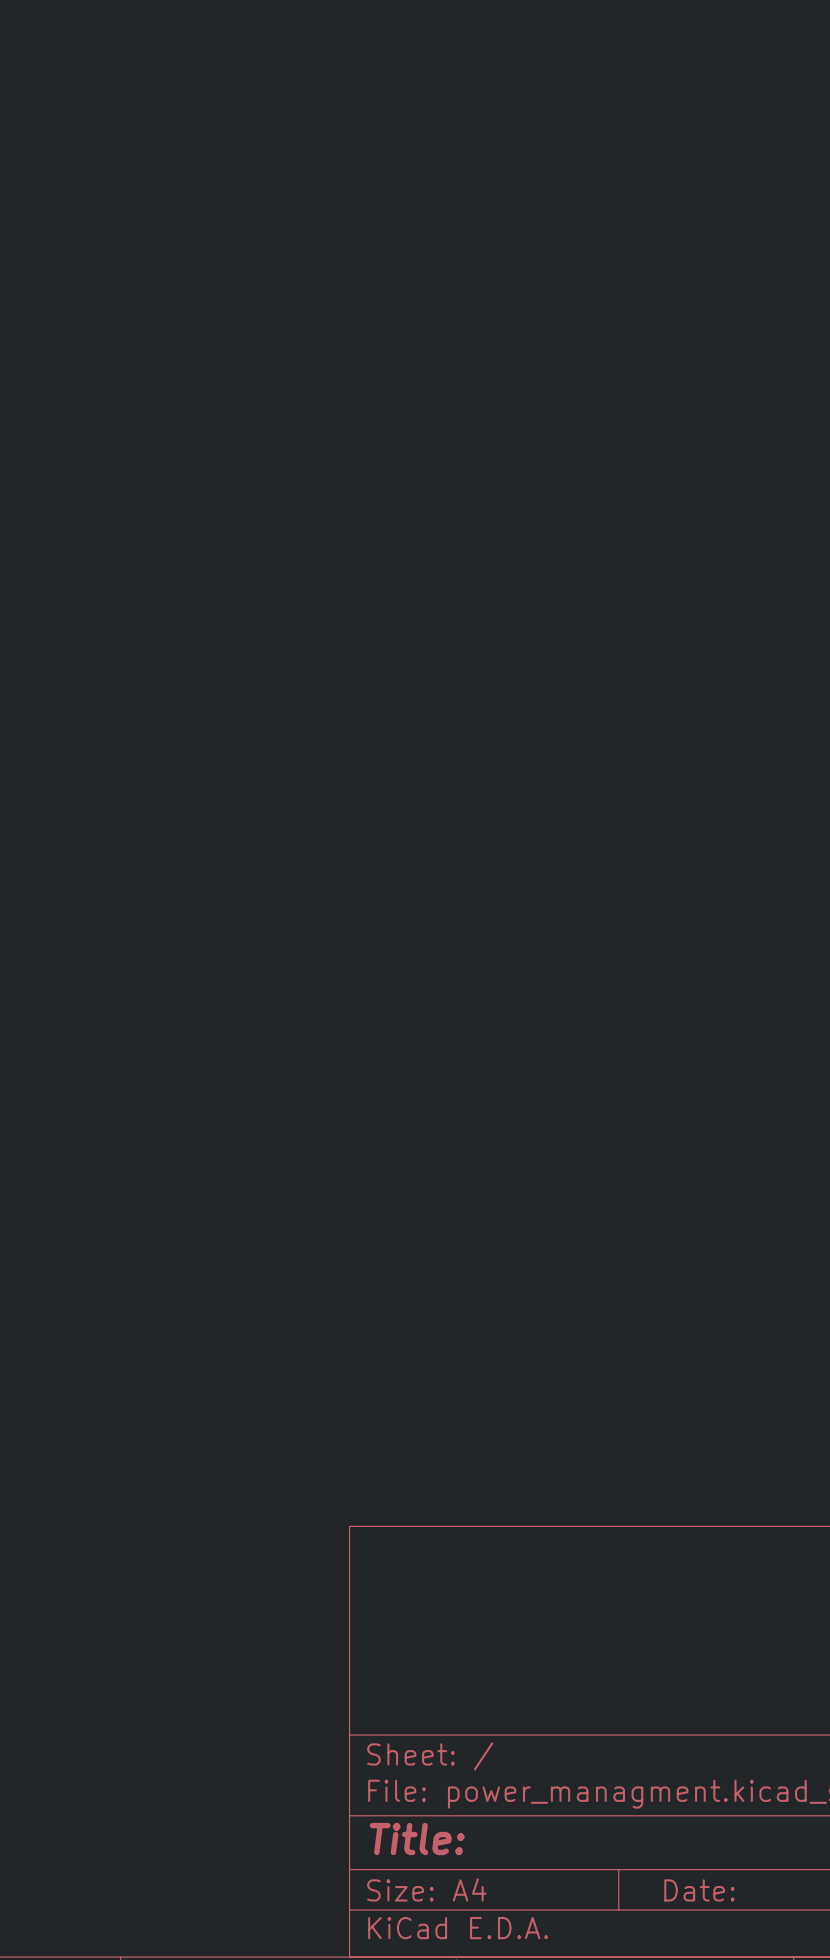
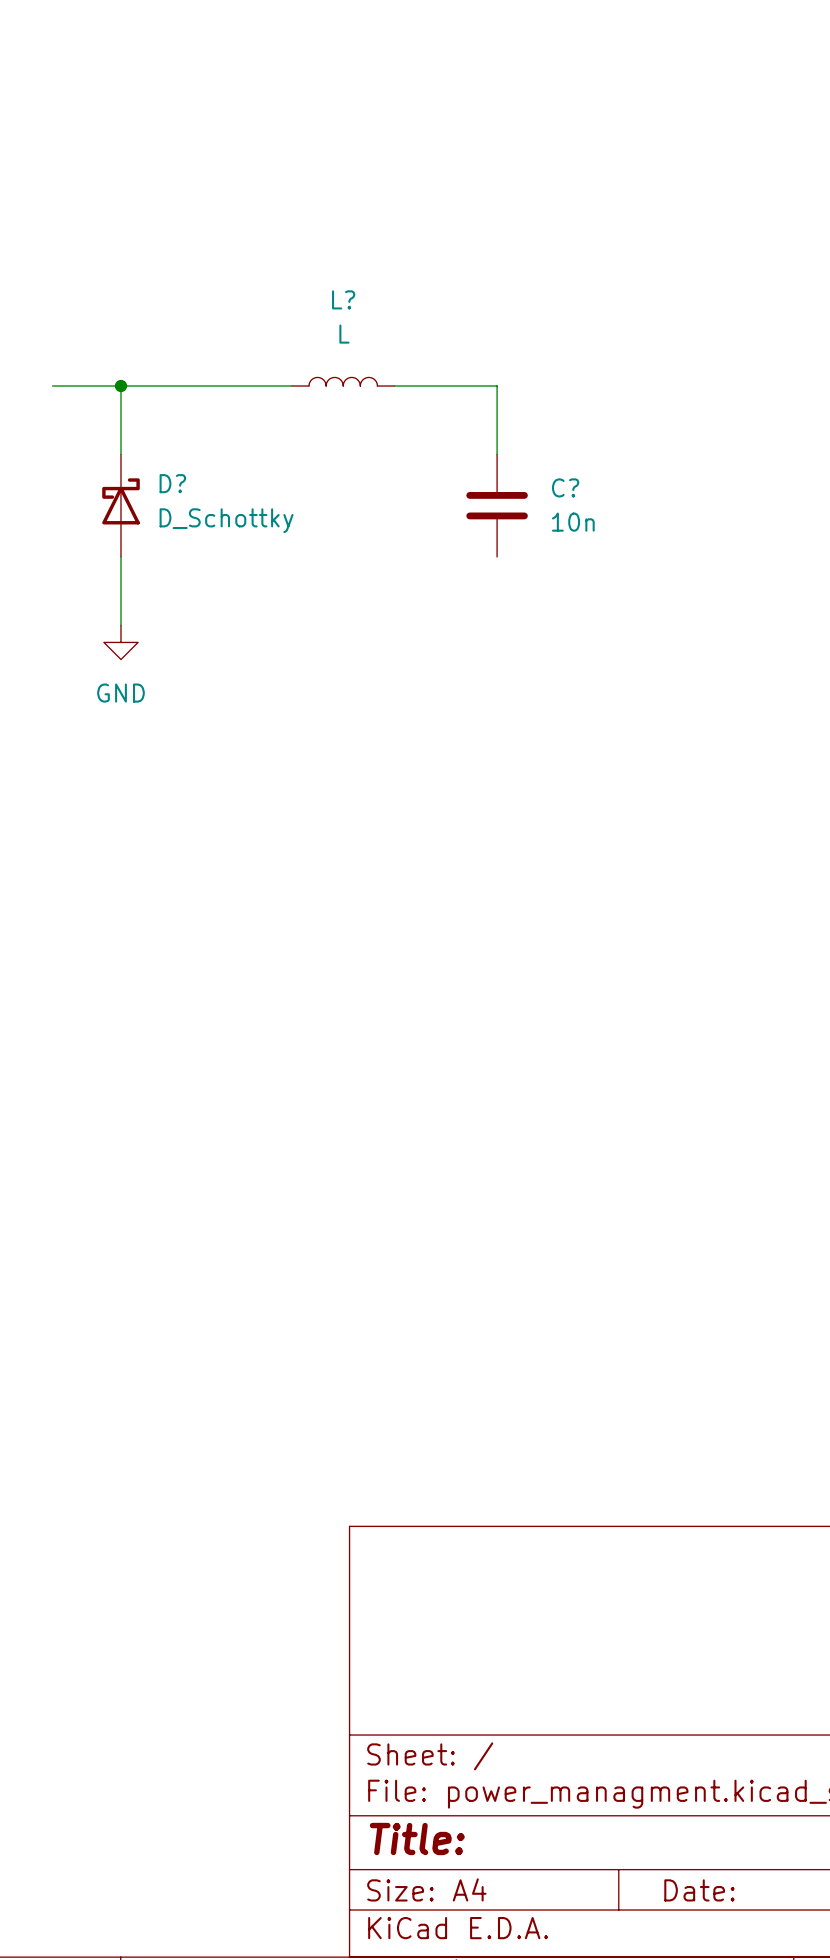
L?: none -> L (343, 381)
wire: none -> (52, 386) (291, 386)
wire: none -> (120, 386) (120, 454)
junction: none -> (120, 386)
wire: none -> (394, 386) (497, 386) (497, 454)
D?: none -> D_Schottky (120, 505)
C?: none -> 10n (497, 505)
wire: none -> (120, 556) (120, 625)
power symbol: none -> GND (120, 642)

